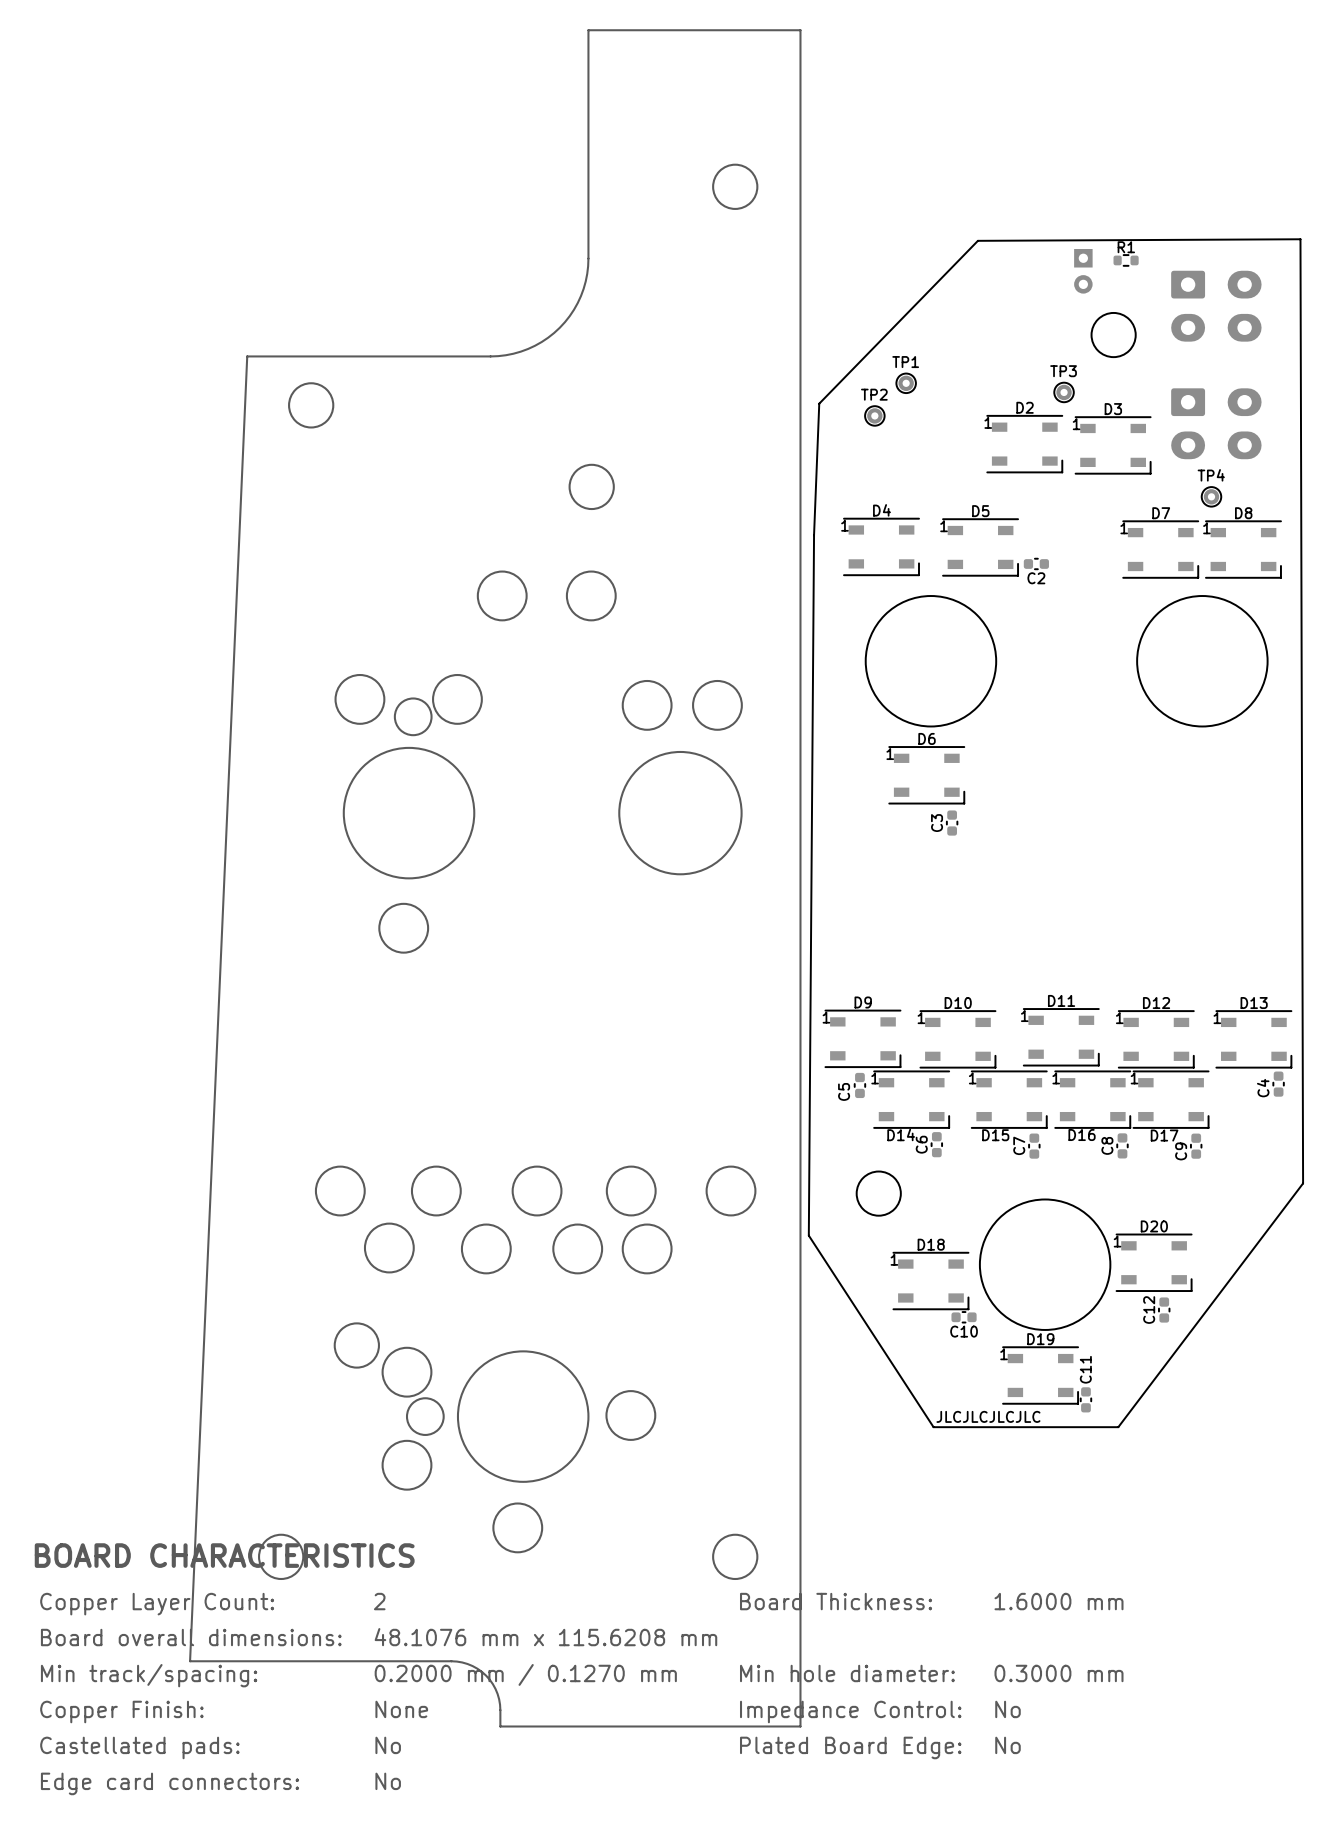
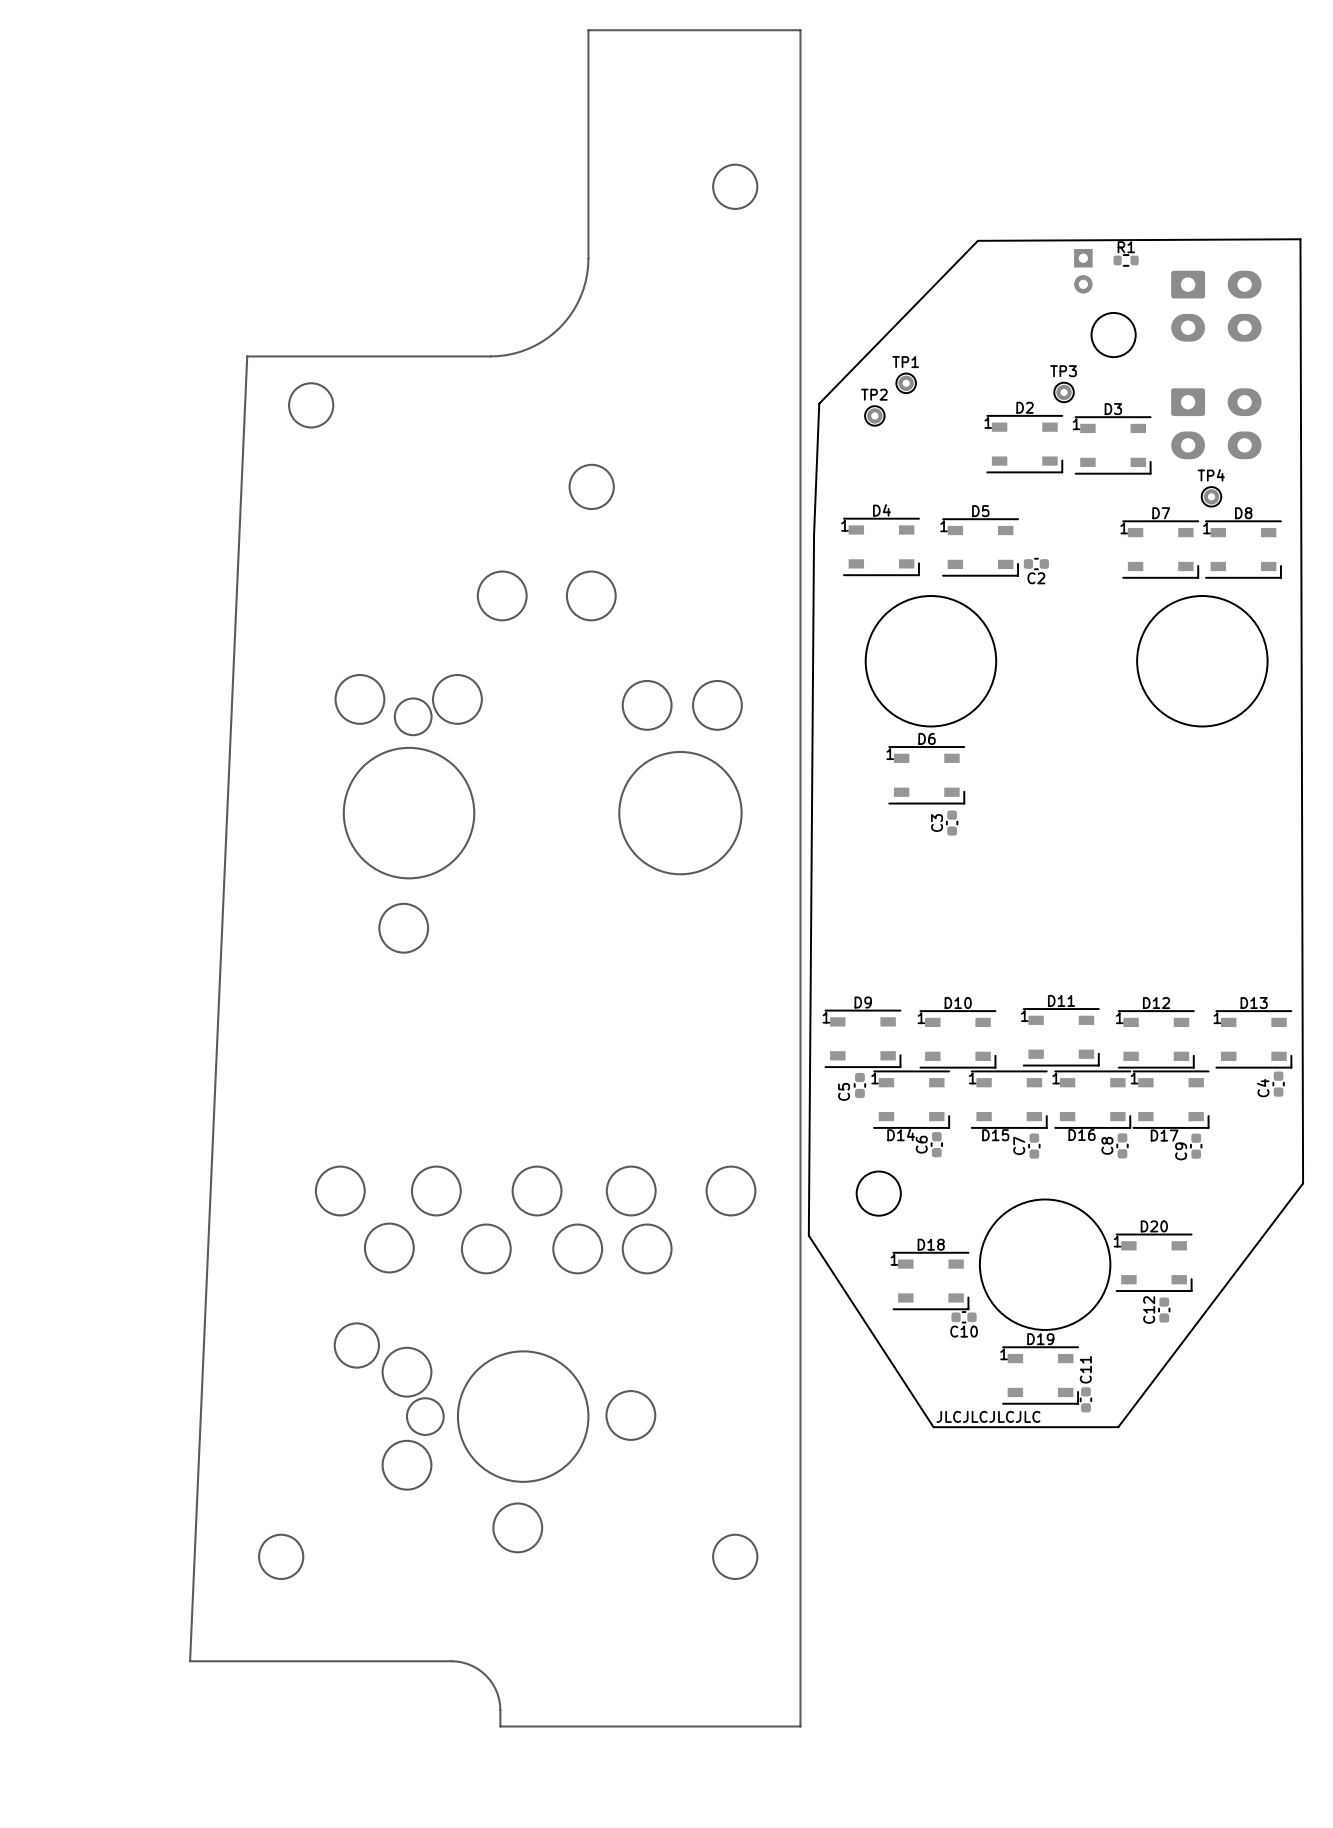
text: BOARD CHARACTERISTICS (224, 1555) -> none
text: 2 (379, 1601) -> none
text: Board Thickness: (836, 1601) -> none
text: 1.6000 mm (1059, 1601) -> none
text: Copper Layer Count: (157, 1604) -> none
text: Board overall dimensions: (191, 1637) -> none
text: 48.1076 mm x 115.6208 mm (545, 1637) -> none
text: Min hole diameter: (847, 1673) -> none
text: 0.3000 mm (1059, 1673) -> none
text: 0.2000 mm / 0.1270 mm (525, 1674) -> none
text: Min track/spacing: (149, 1675) -> none
text: None (401, 1709) -> none
text: No (1007, 1709) -> none
text: Copper Finish: (121, 1712) -> none
text: Impedance Control: (850, 1712) -> none
text: No (388, 1745) -> none
text: No (1007, 1745) -> none
text: Castellated pads: (139, 1747) -> none
text: Plated Board Edge: (850, 1747) -> none
text: No (388, 1781) -> none
text: Edge card connectors: (169, 1783) -> none

